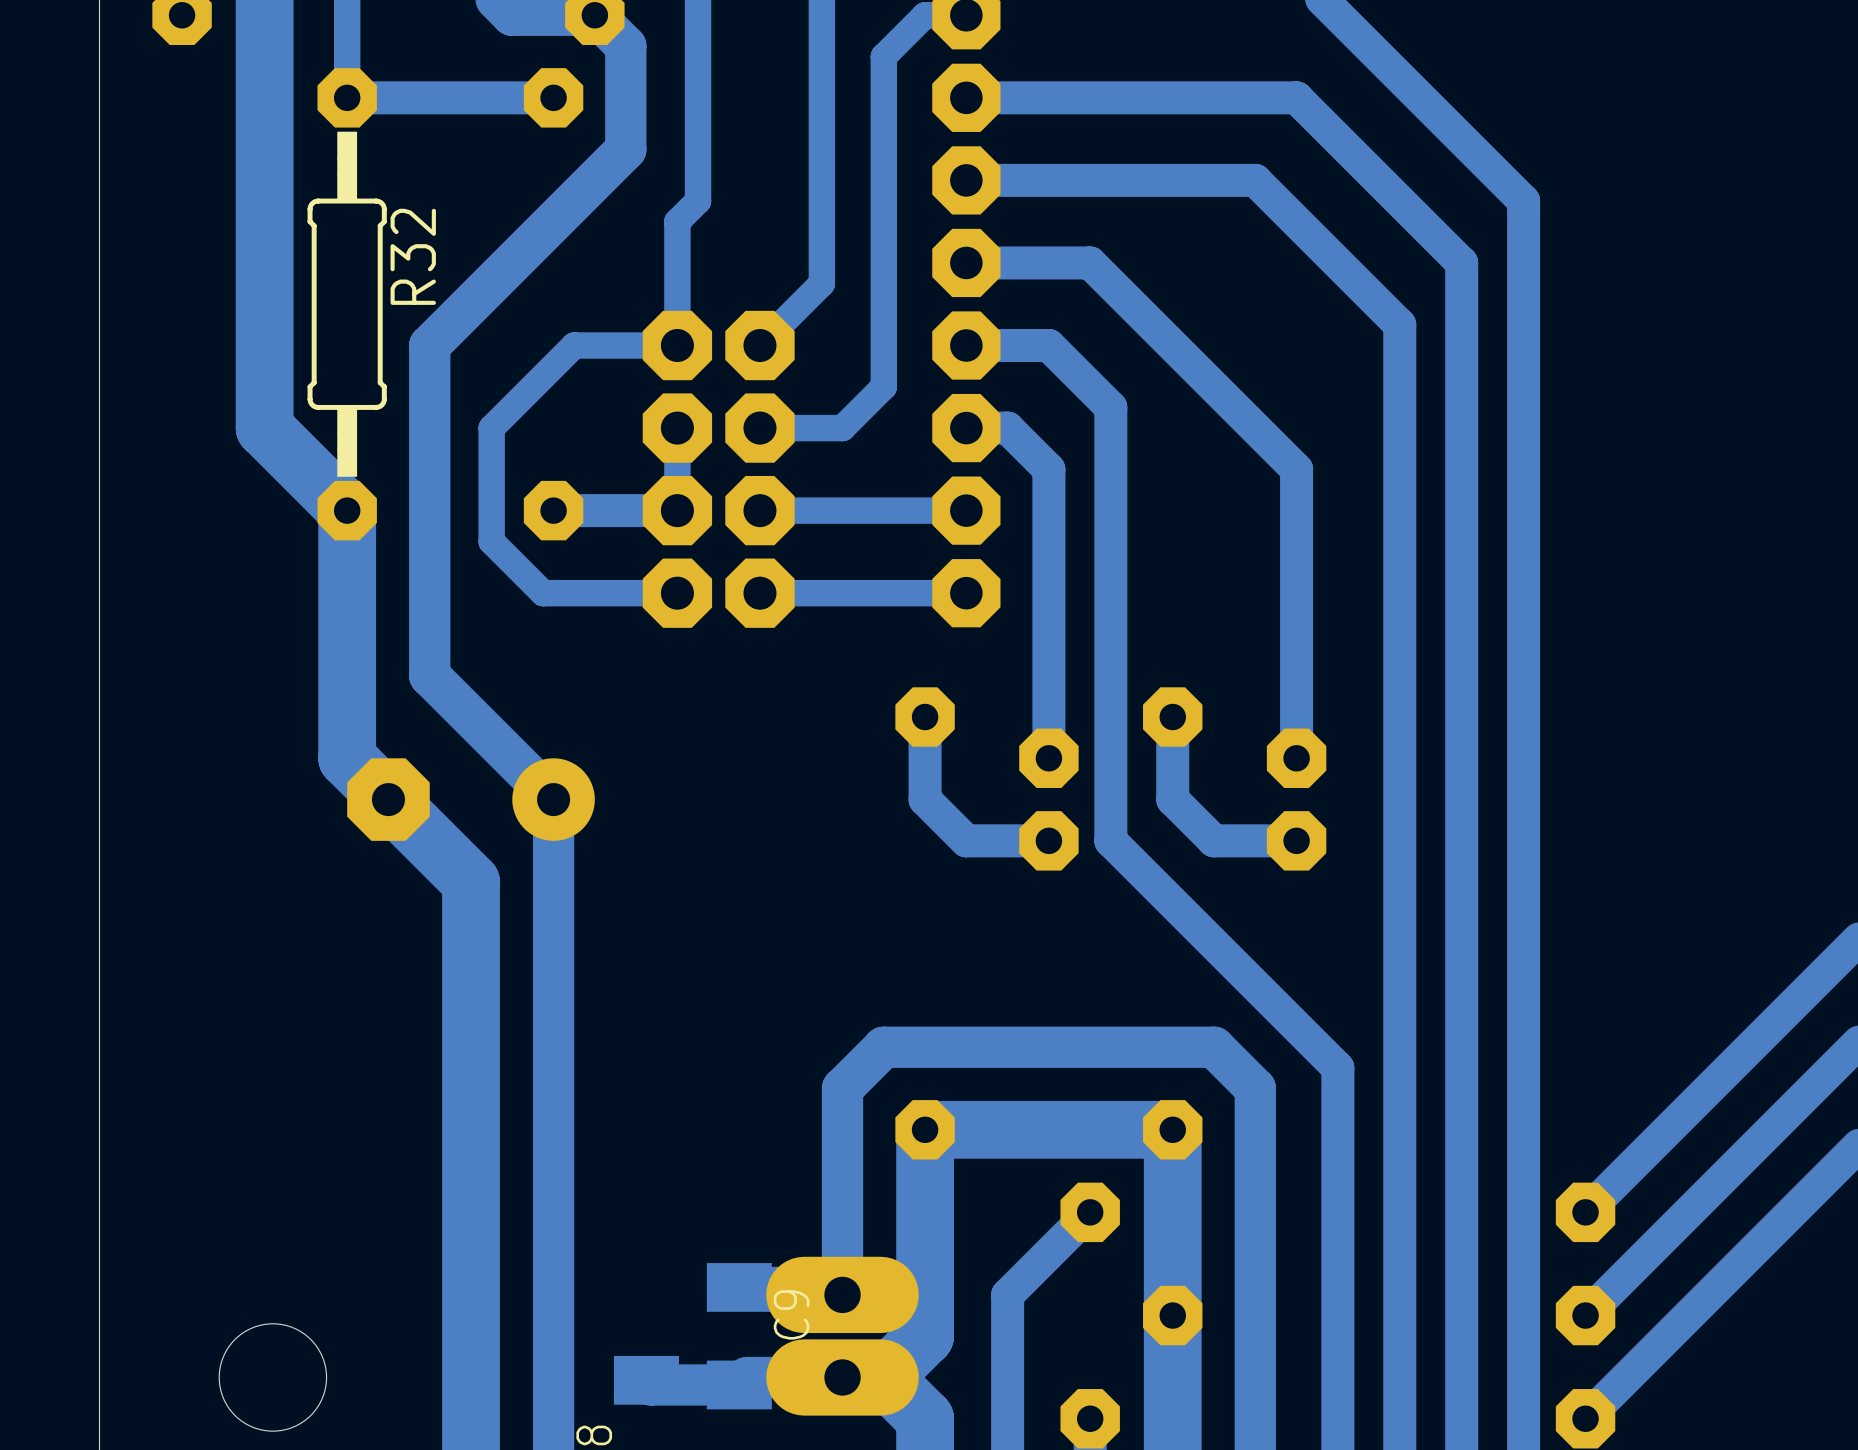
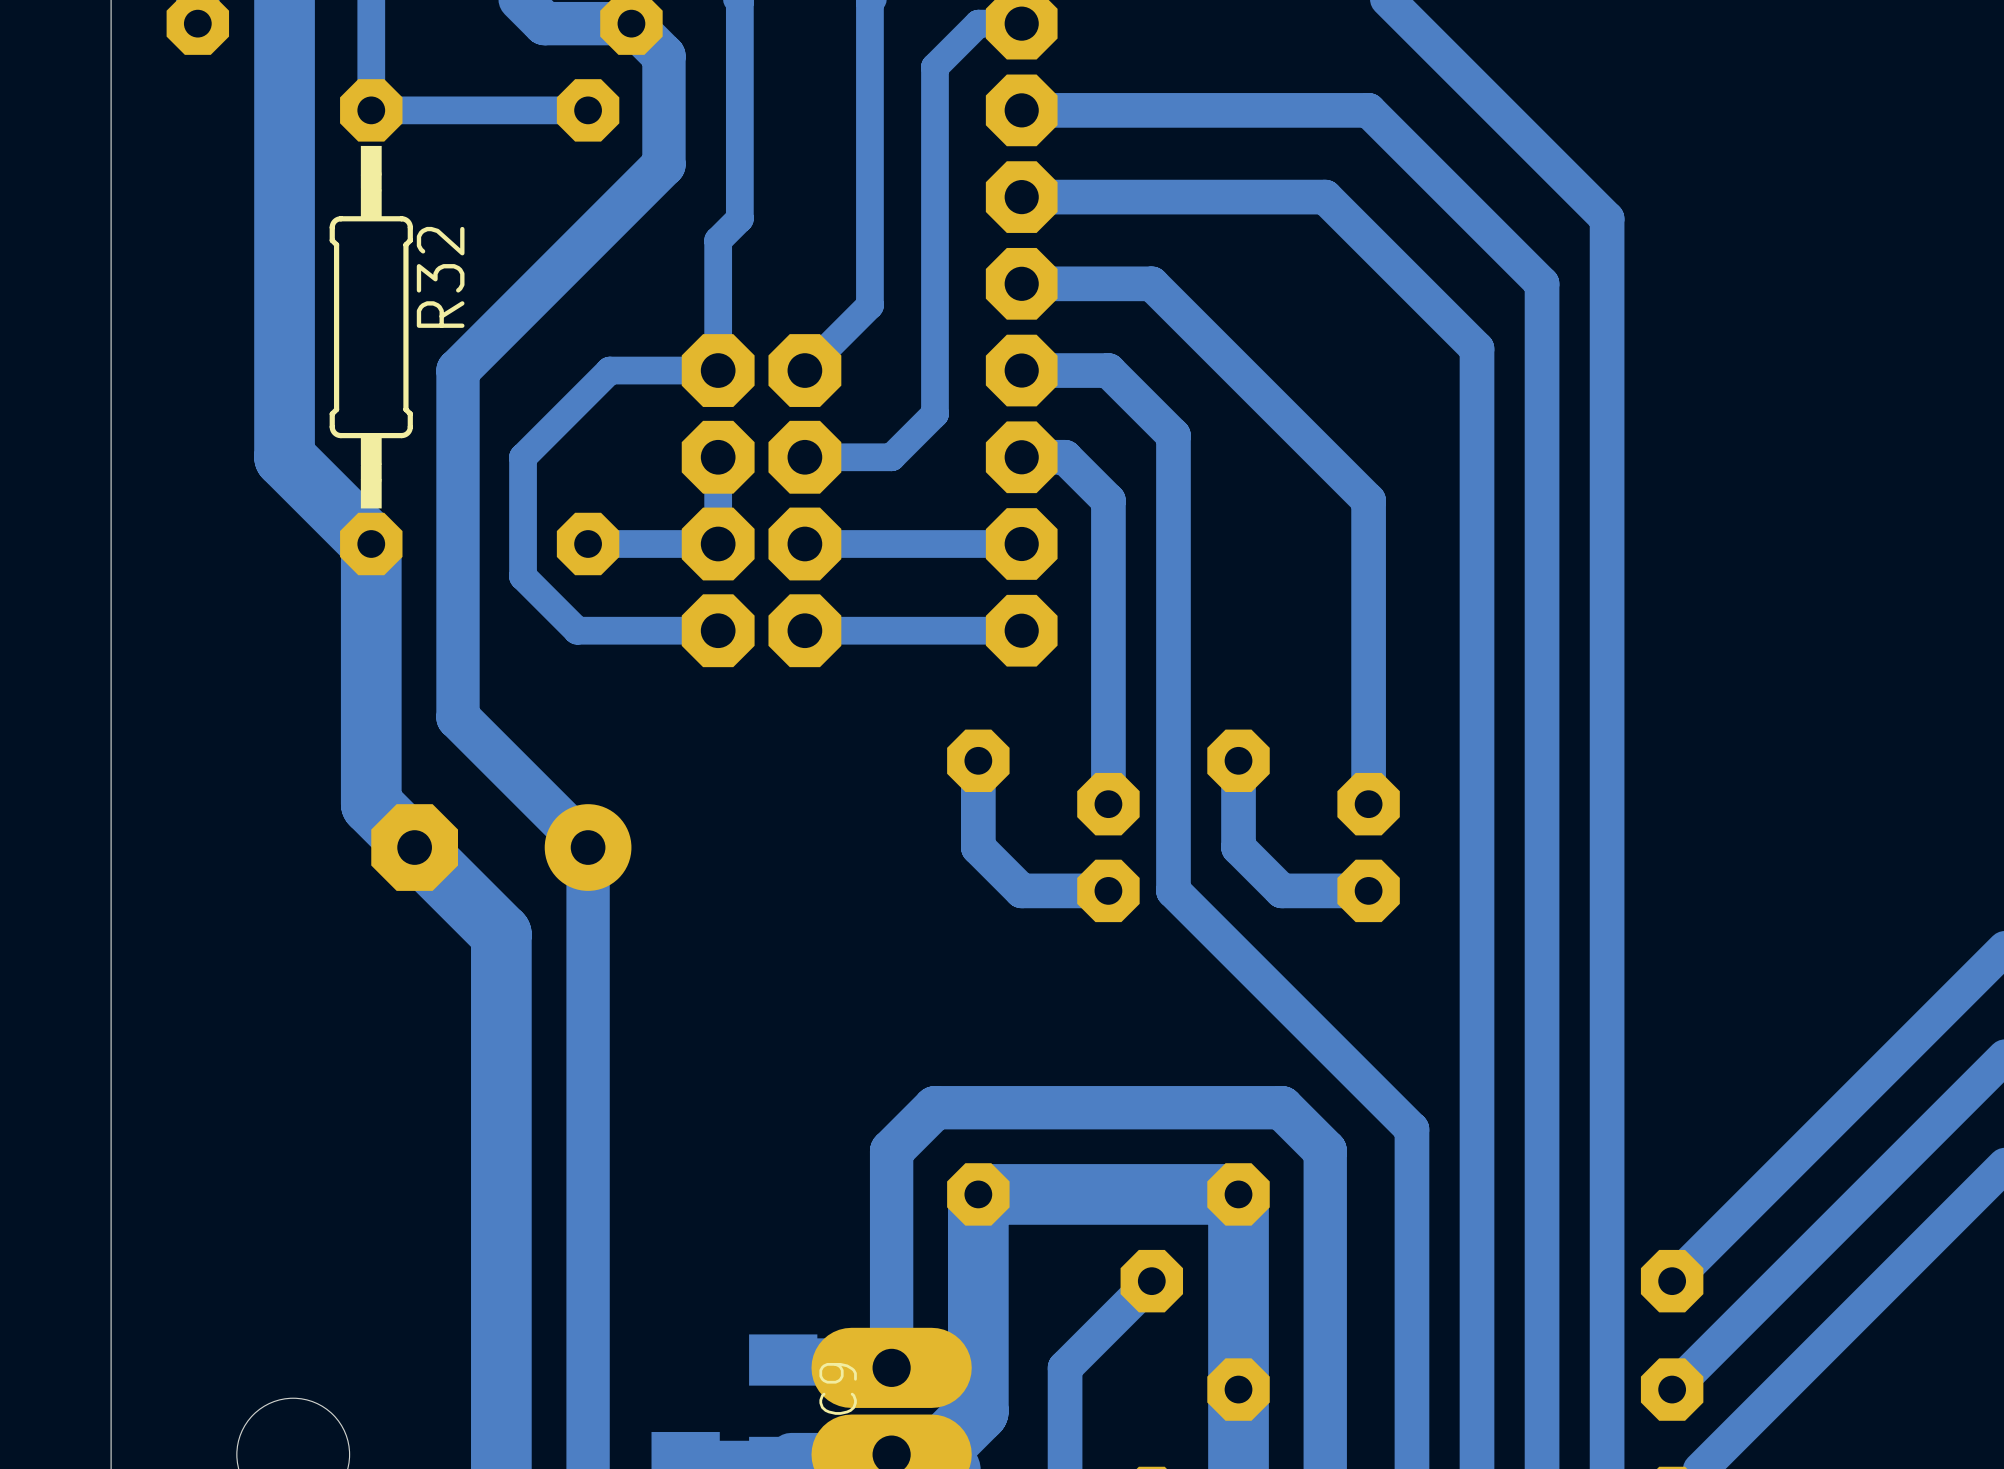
track width: thick (553, 97) (347, 97) -> thin (588, 110) (371, 110)
track width: thick (677, 510) (553, 510) -> thin (718, 543) (588, 543)

